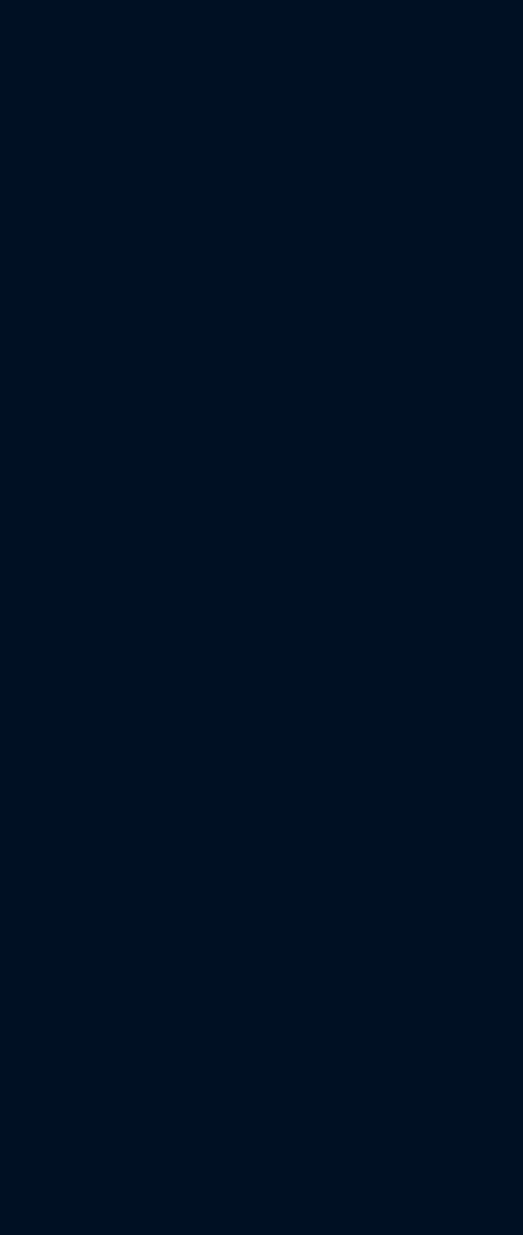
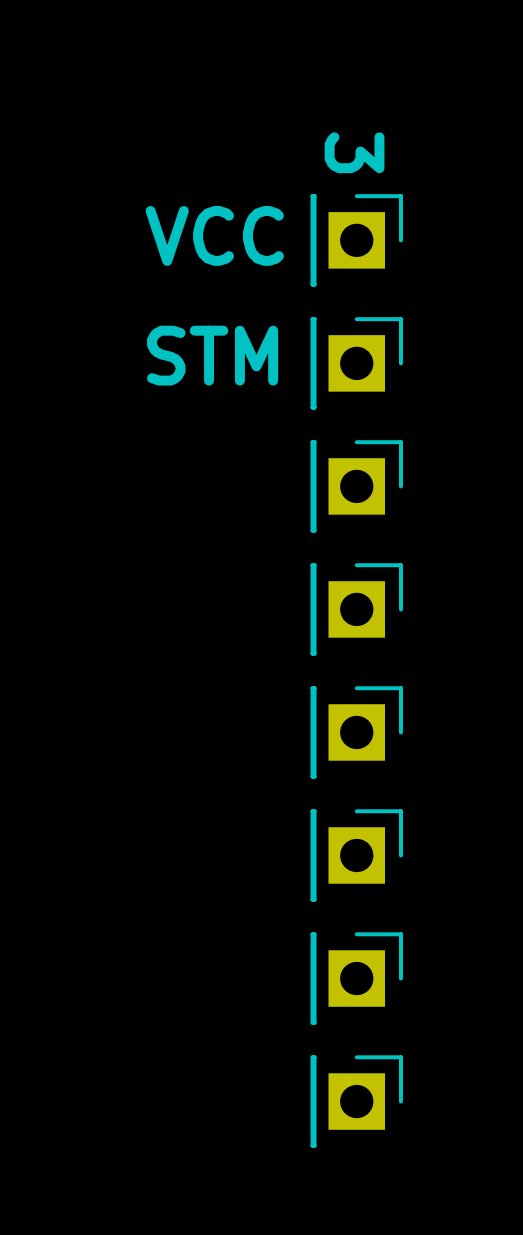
text: none -> 3 (354, 152)
text: none -> VCC (214, 235)
part: none -> (356, 240)
text: none -> STM (212, 355)
part: none -> (356, 363)
part: none -> (356, 486)
part: none -> (356, 609)
part: none -> (356, 732)
part: none -> (356, 855)
part: none -> (356, 978)
part: none -> (356, 1101)

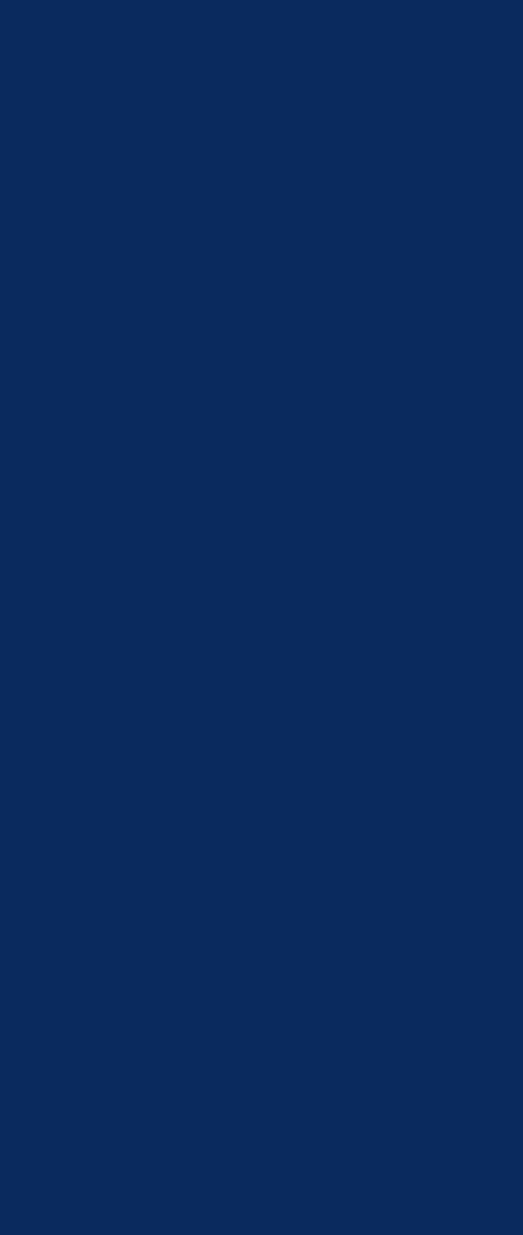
text: 3 (354, 152) -> none
text: VCC (214, 235) -> none
part: (356, 240) -> none
text: STM (212, 355) -> none
part: (356, 363) -> none
part: (356, 486) -> none
part: (356, 609) -> none
part: (356, 732) -> none
part: (356, 855) -> none
part: (356, 978) -> none
part: (356, 1101) -> none

